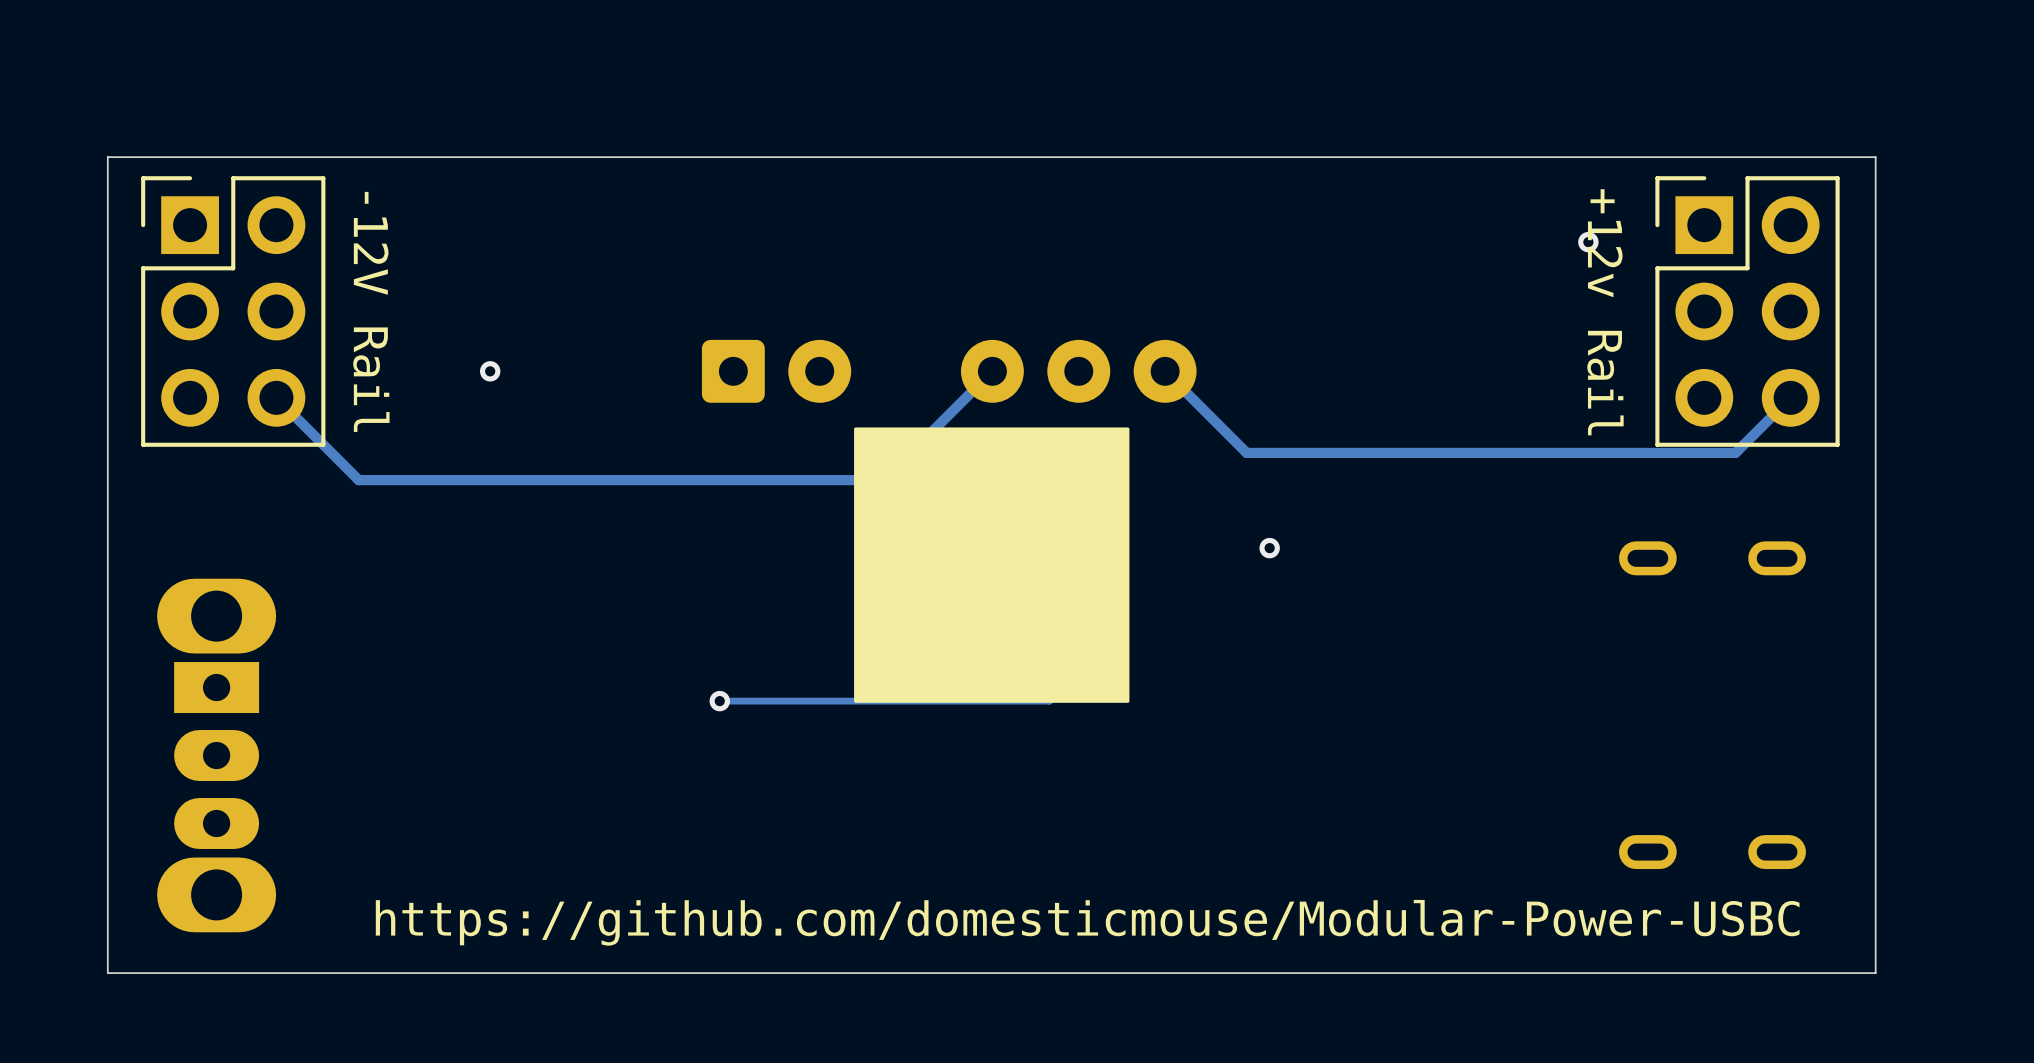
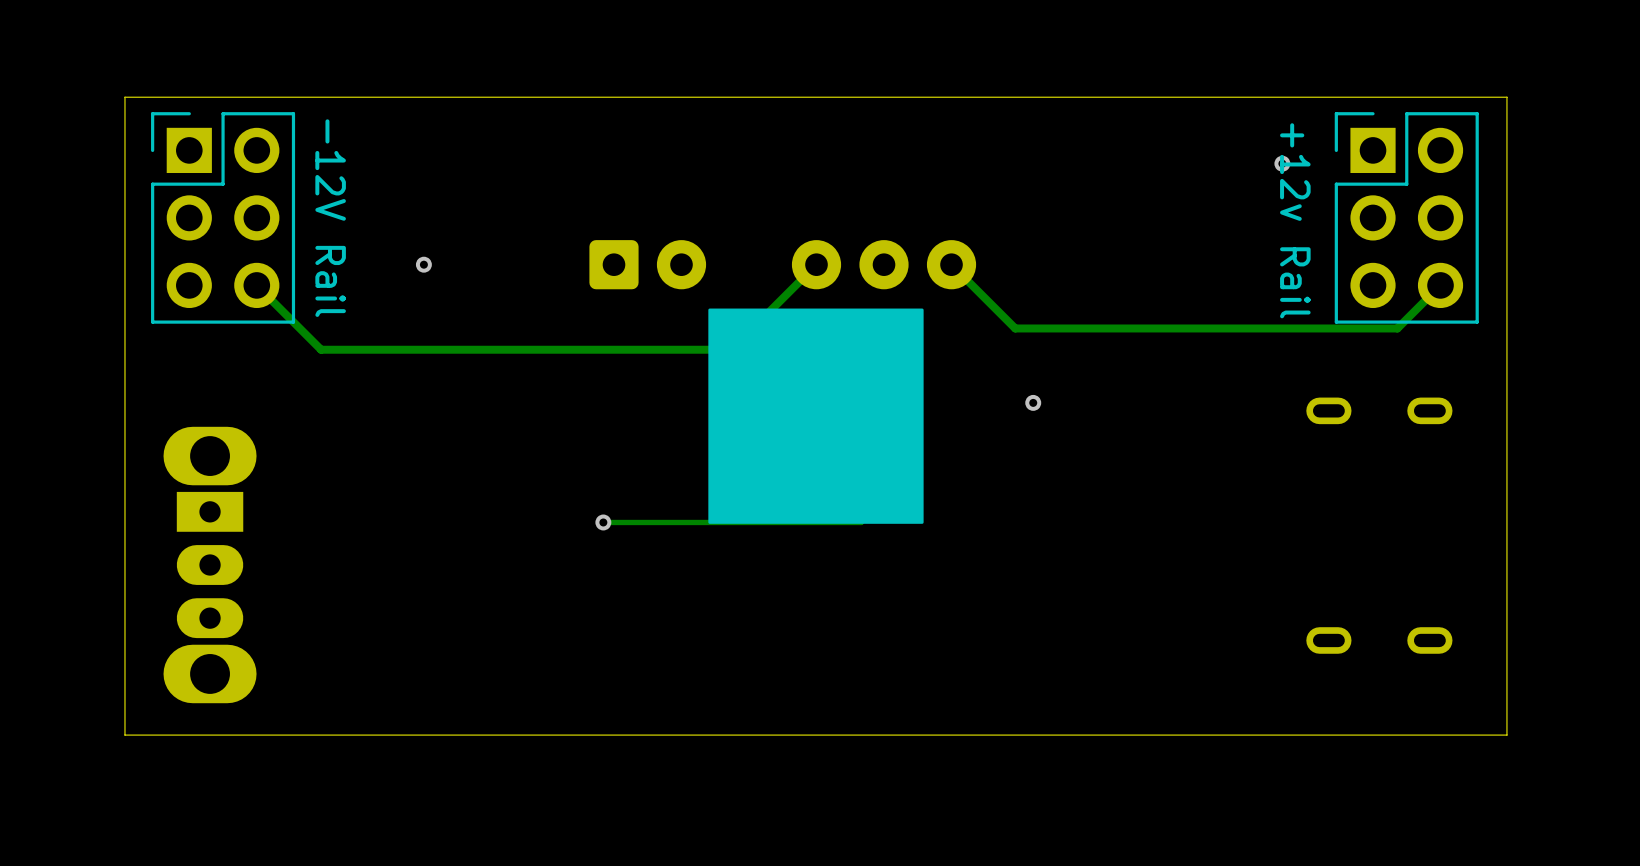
text: https://github.com/domesticmouse/Modular-Power-USBC (1087, 922) -> none

